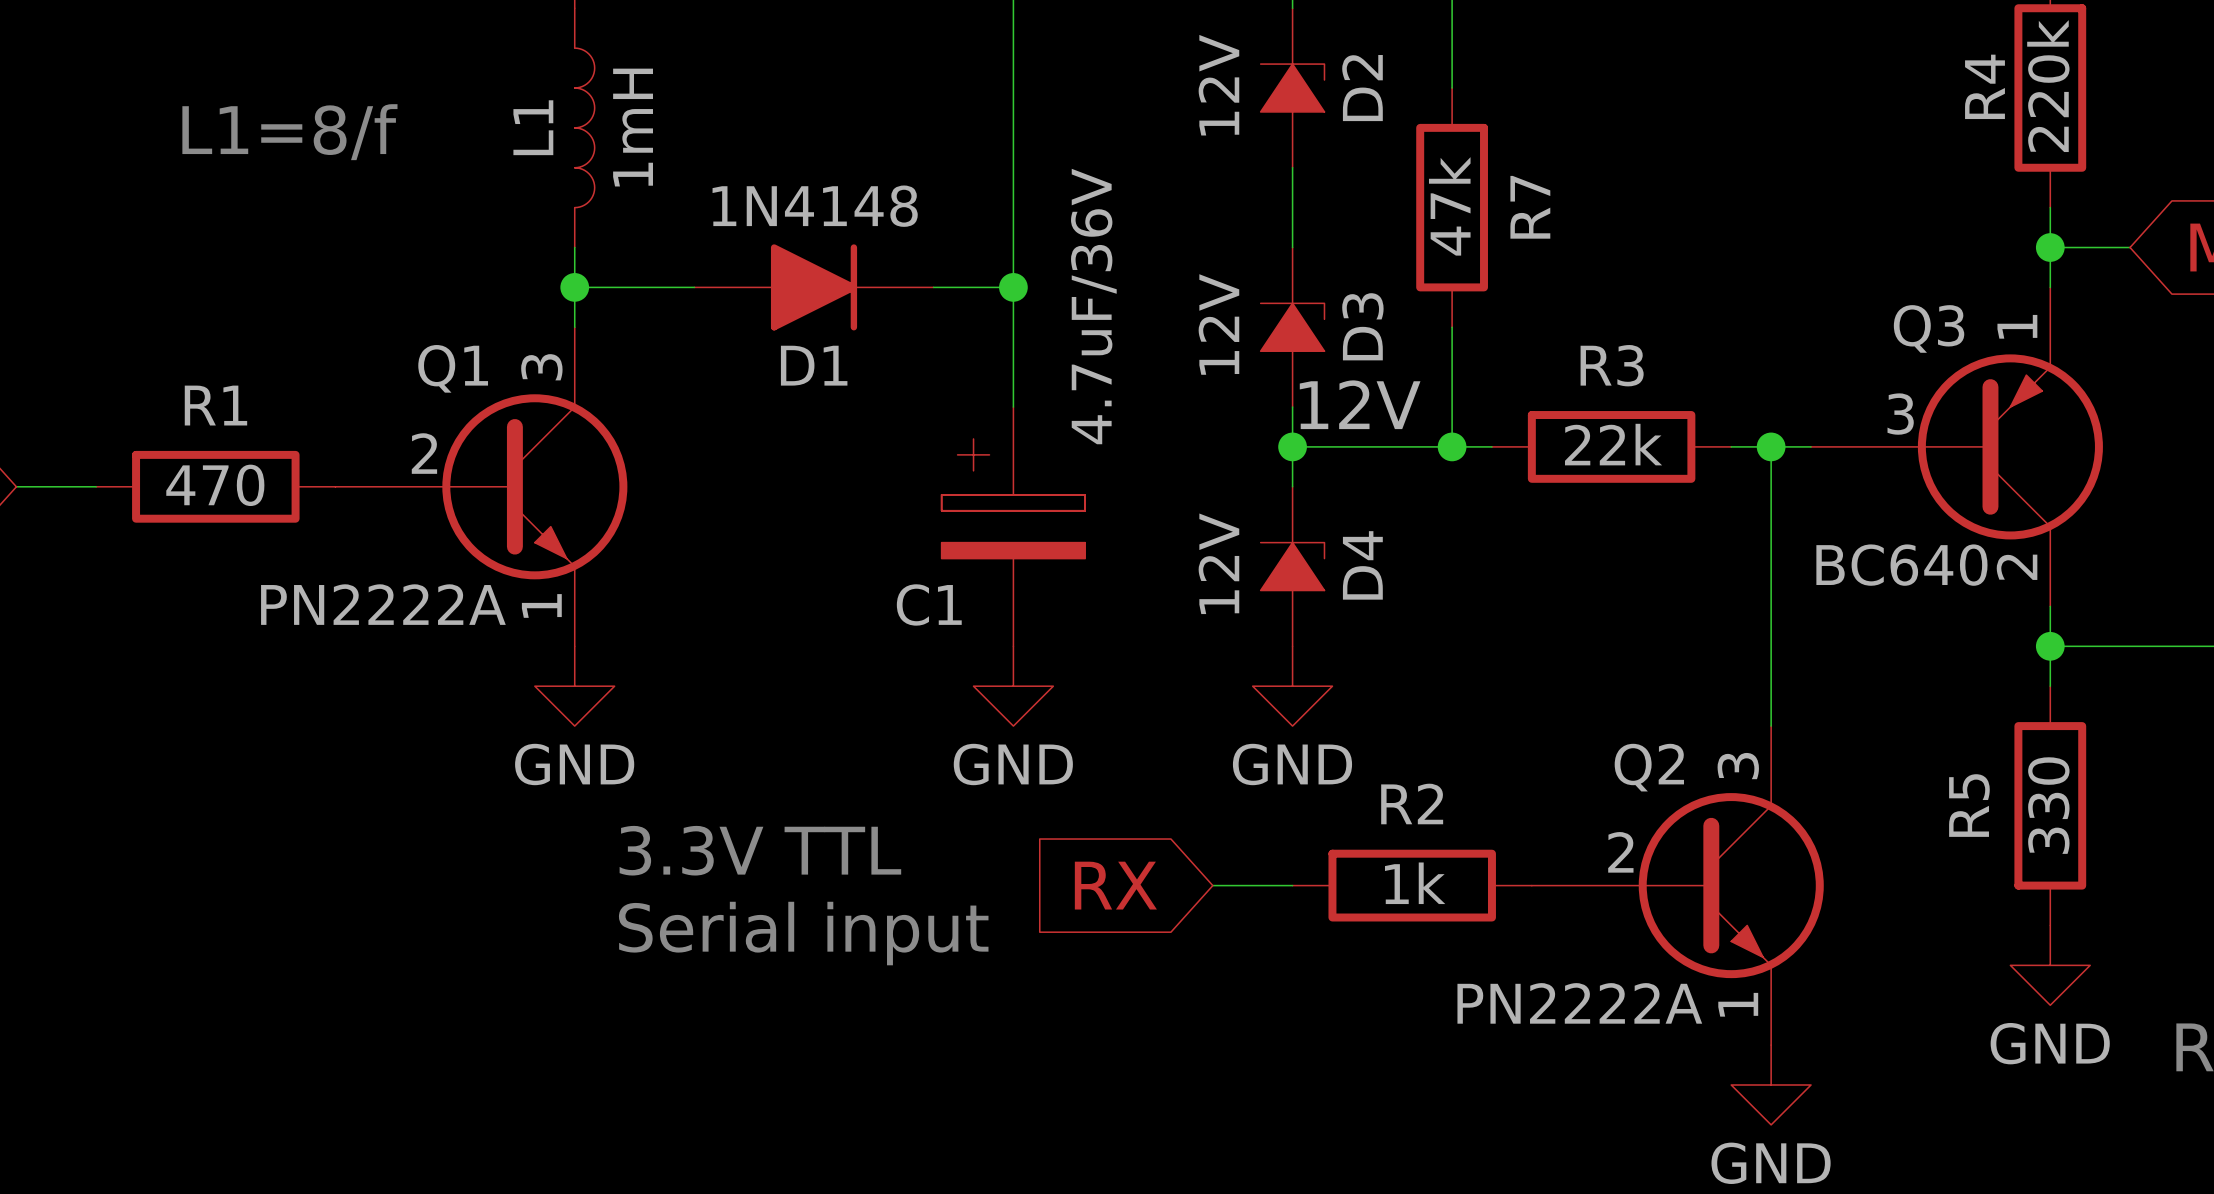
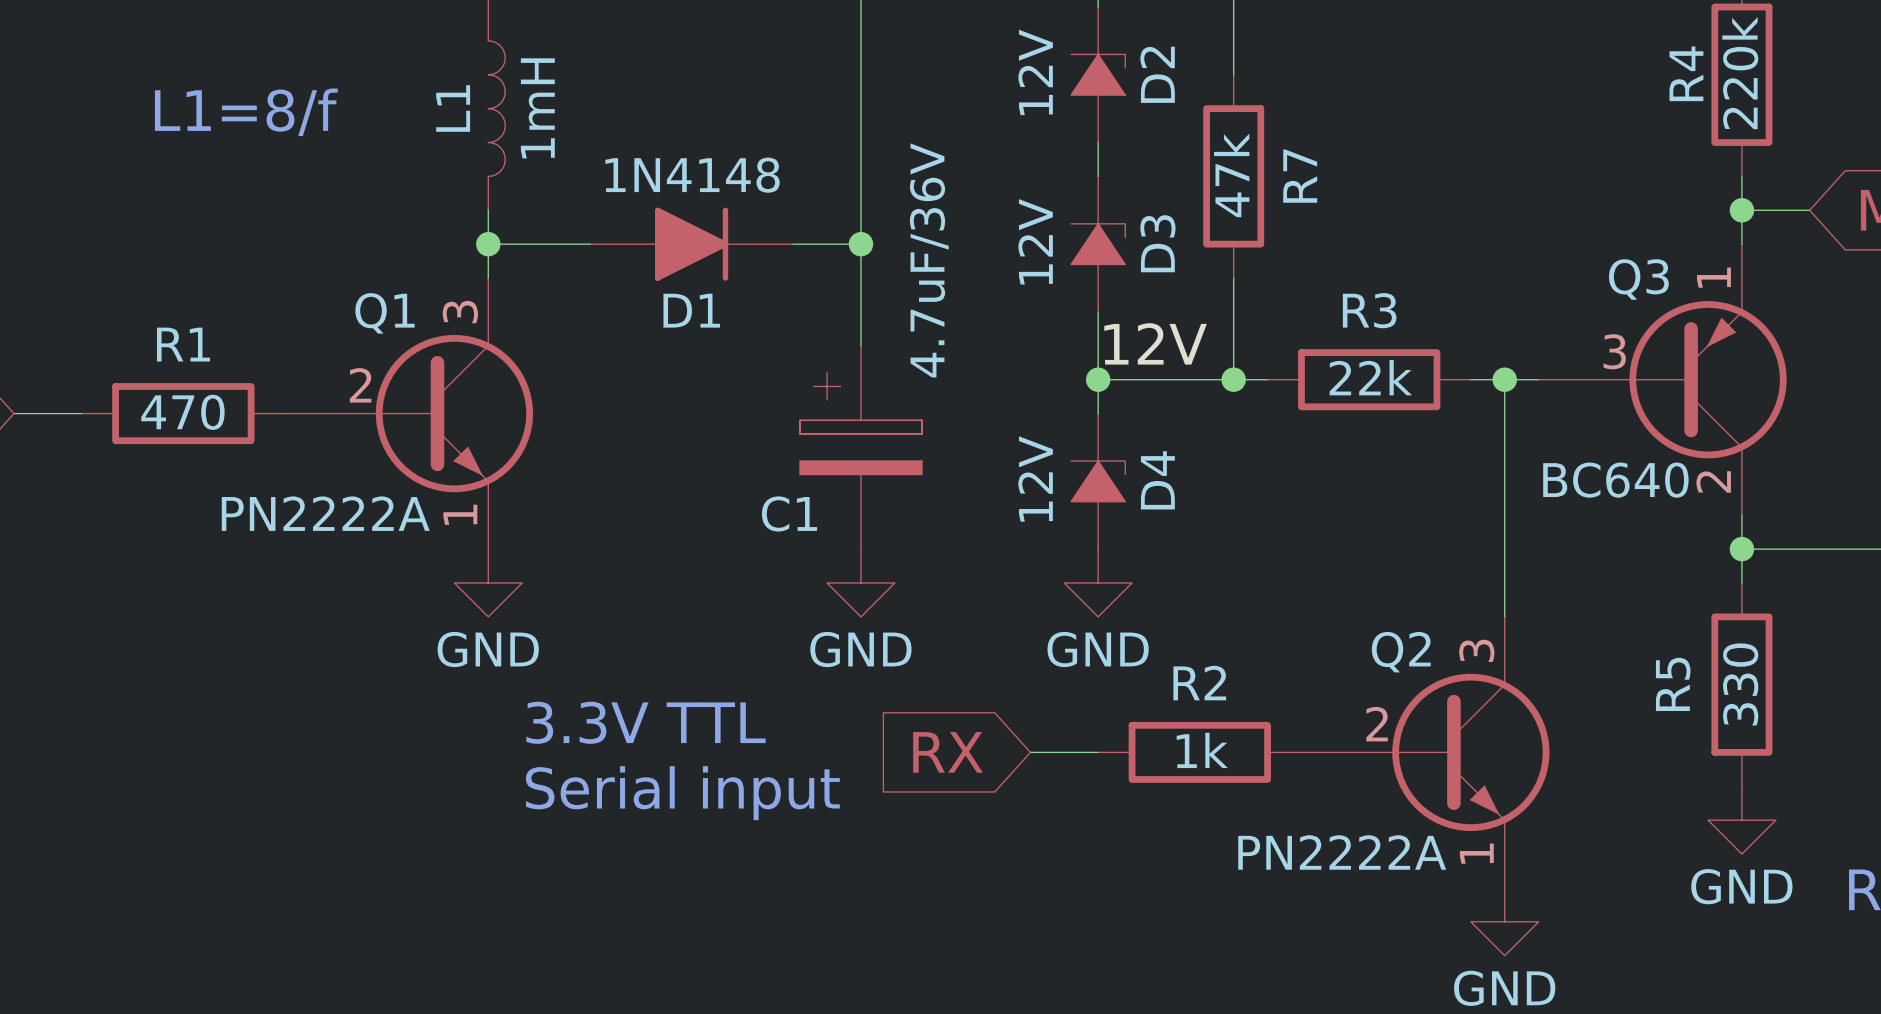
D3 position: (1292, 327) -> (1098, 244)

